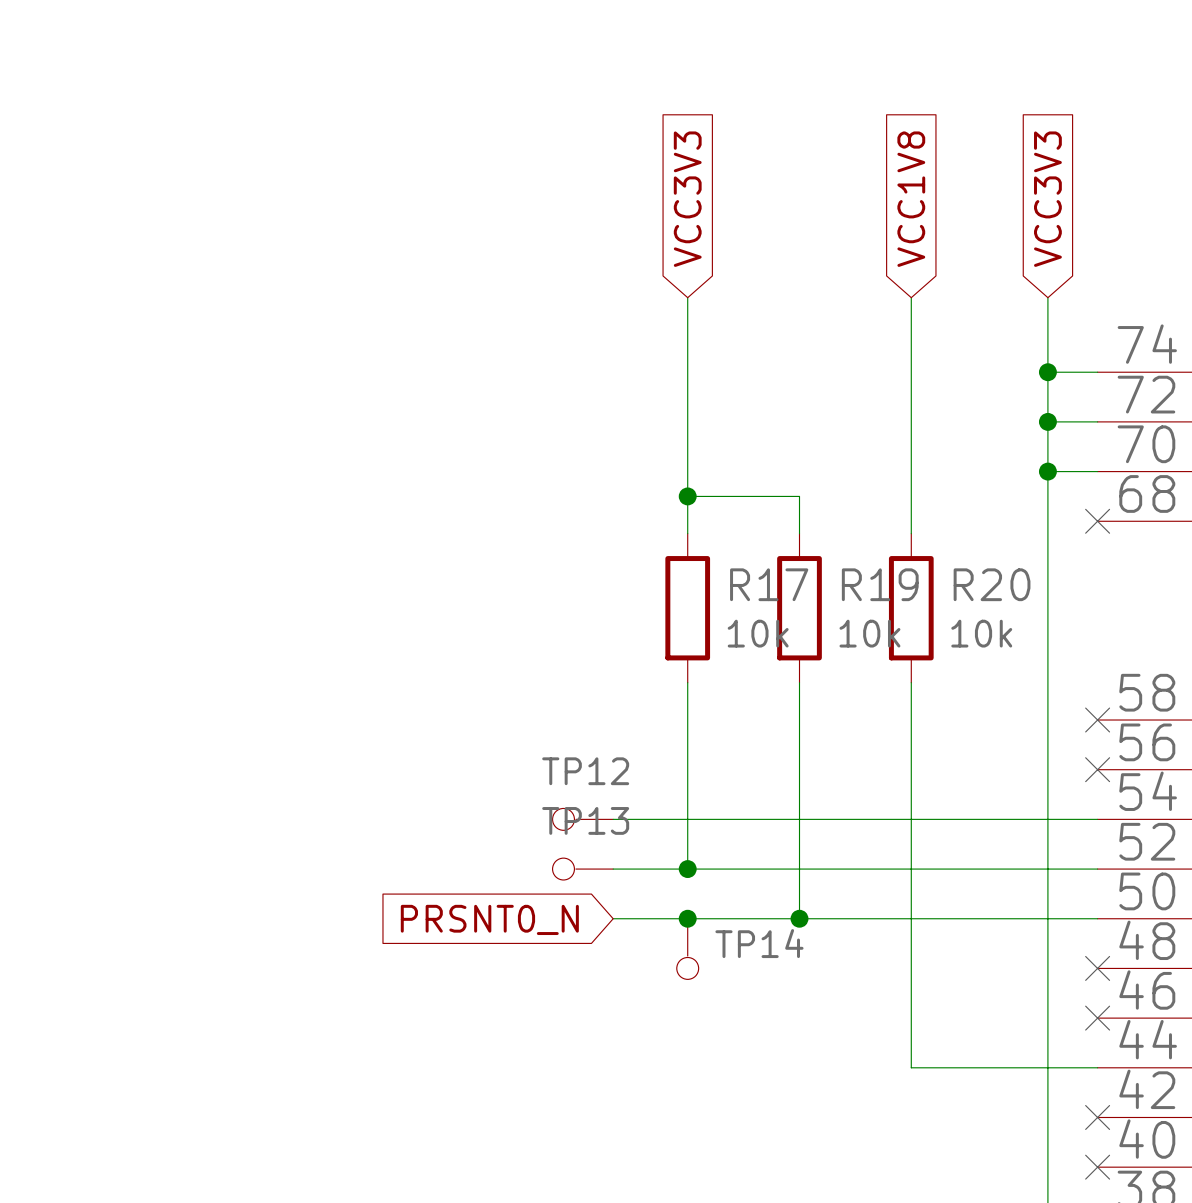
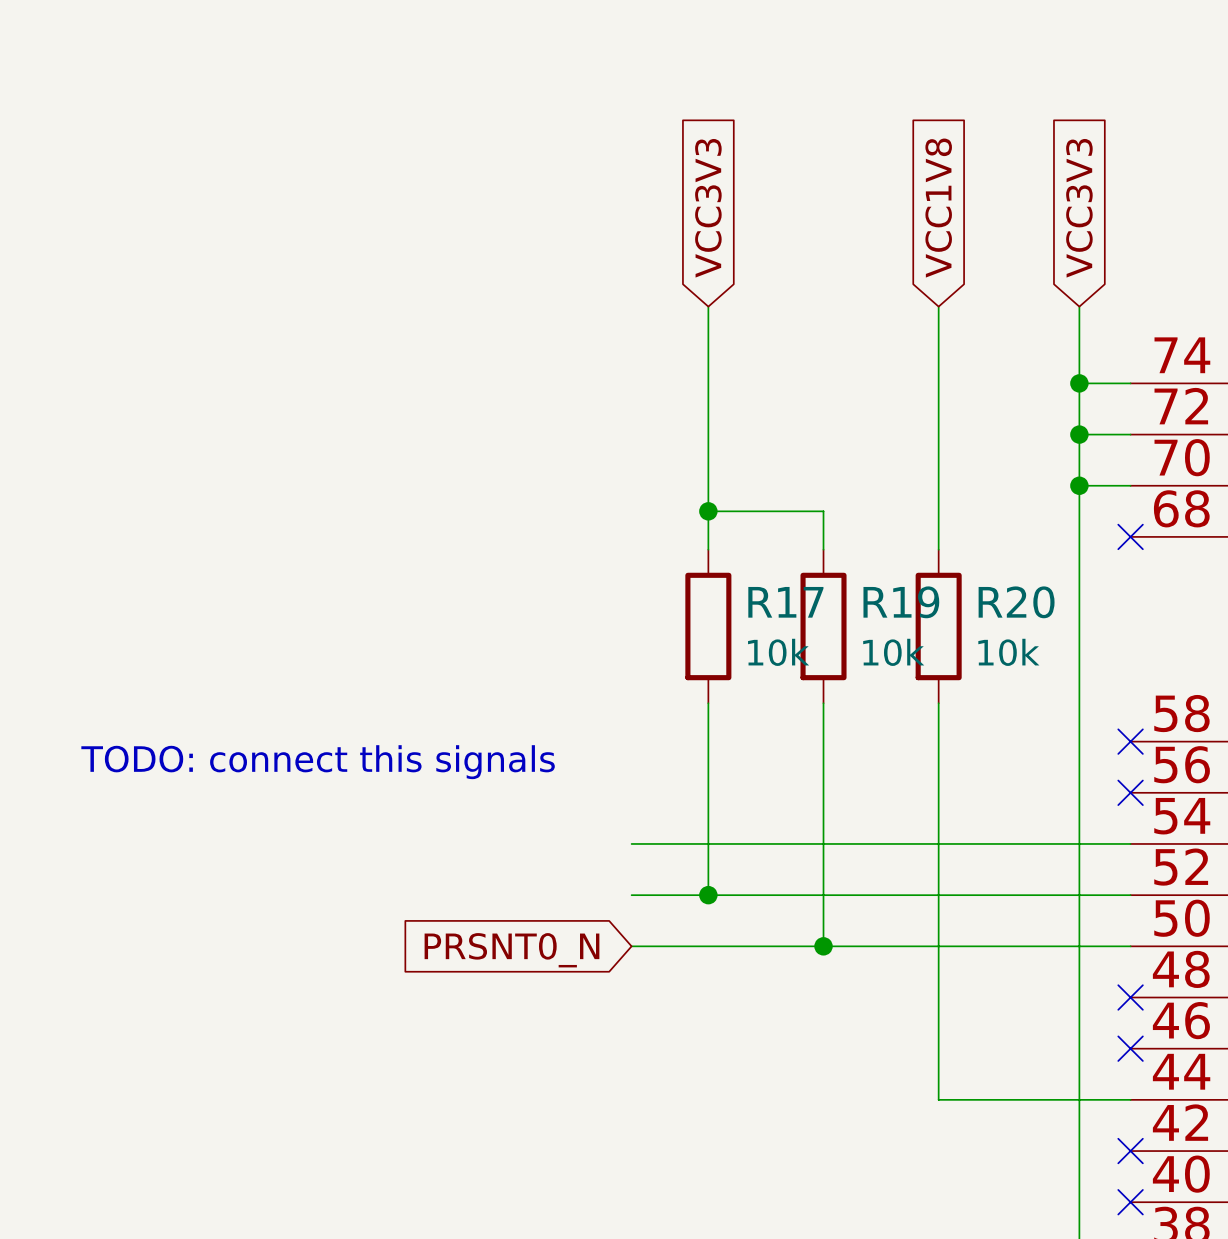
text: none -> TODO: connect this signals (318, 762)
TP12: (582, 819) -> none
TP13: (582, 869) -> none
junction: (687, 918) -> none
TP14: (687, 949) -> none

